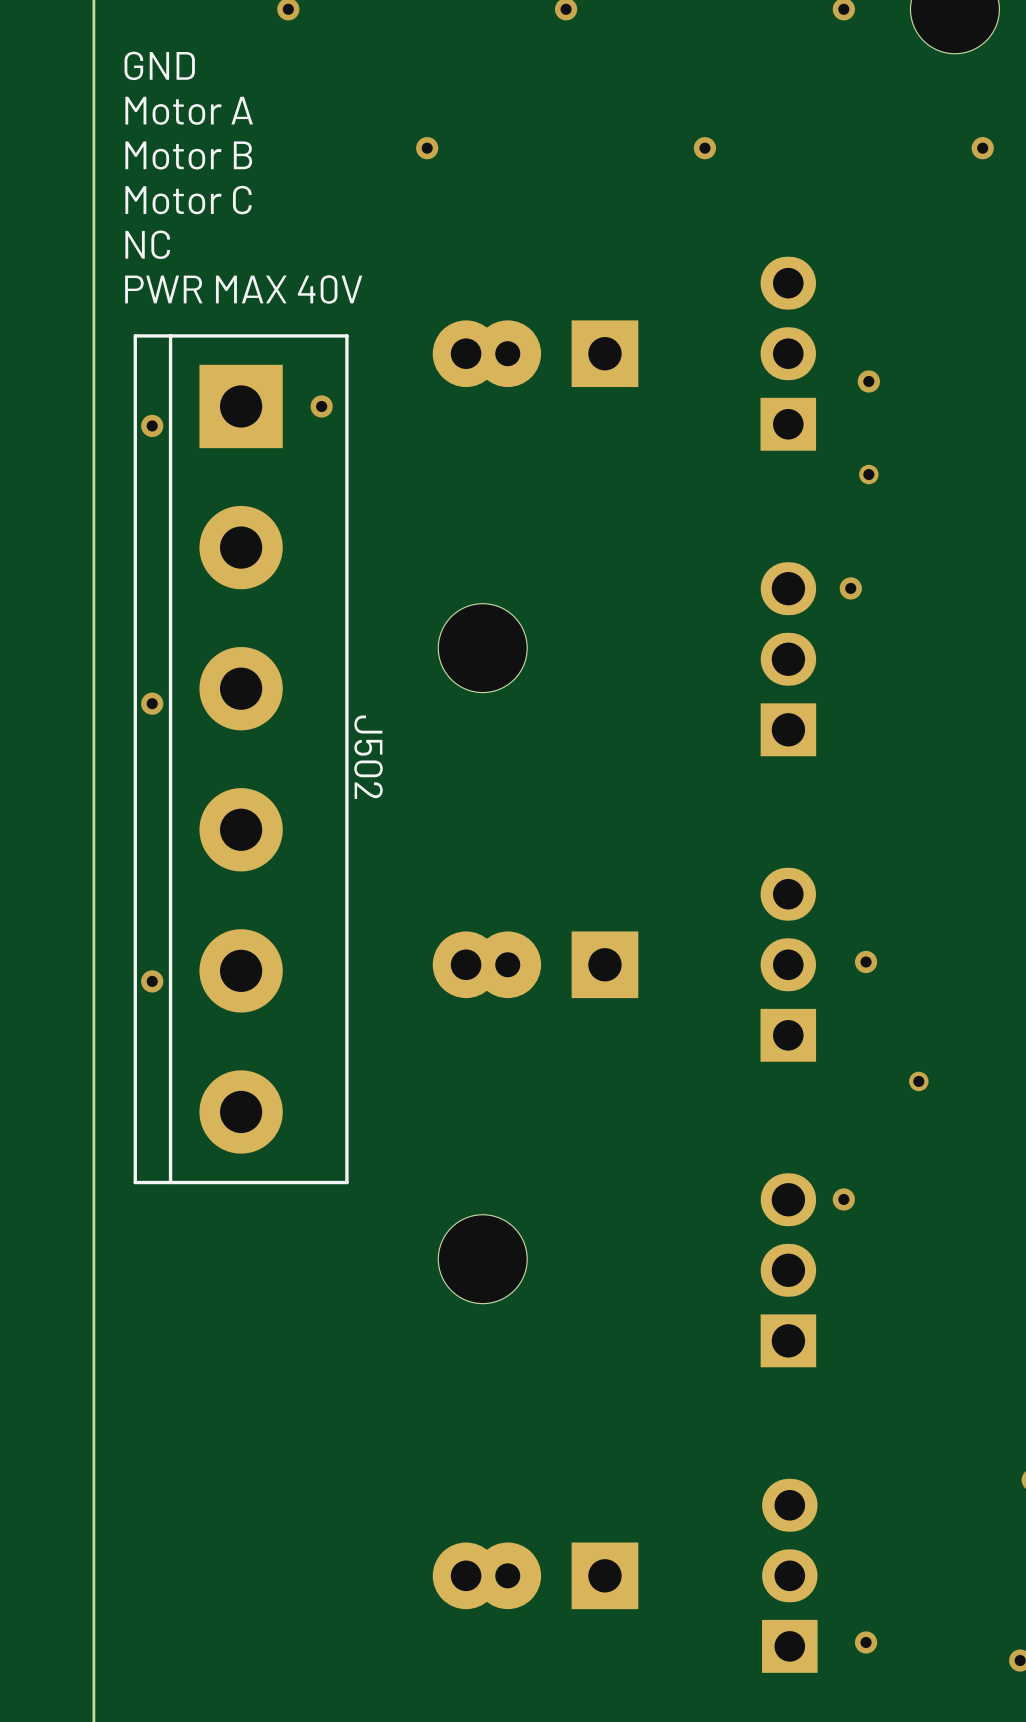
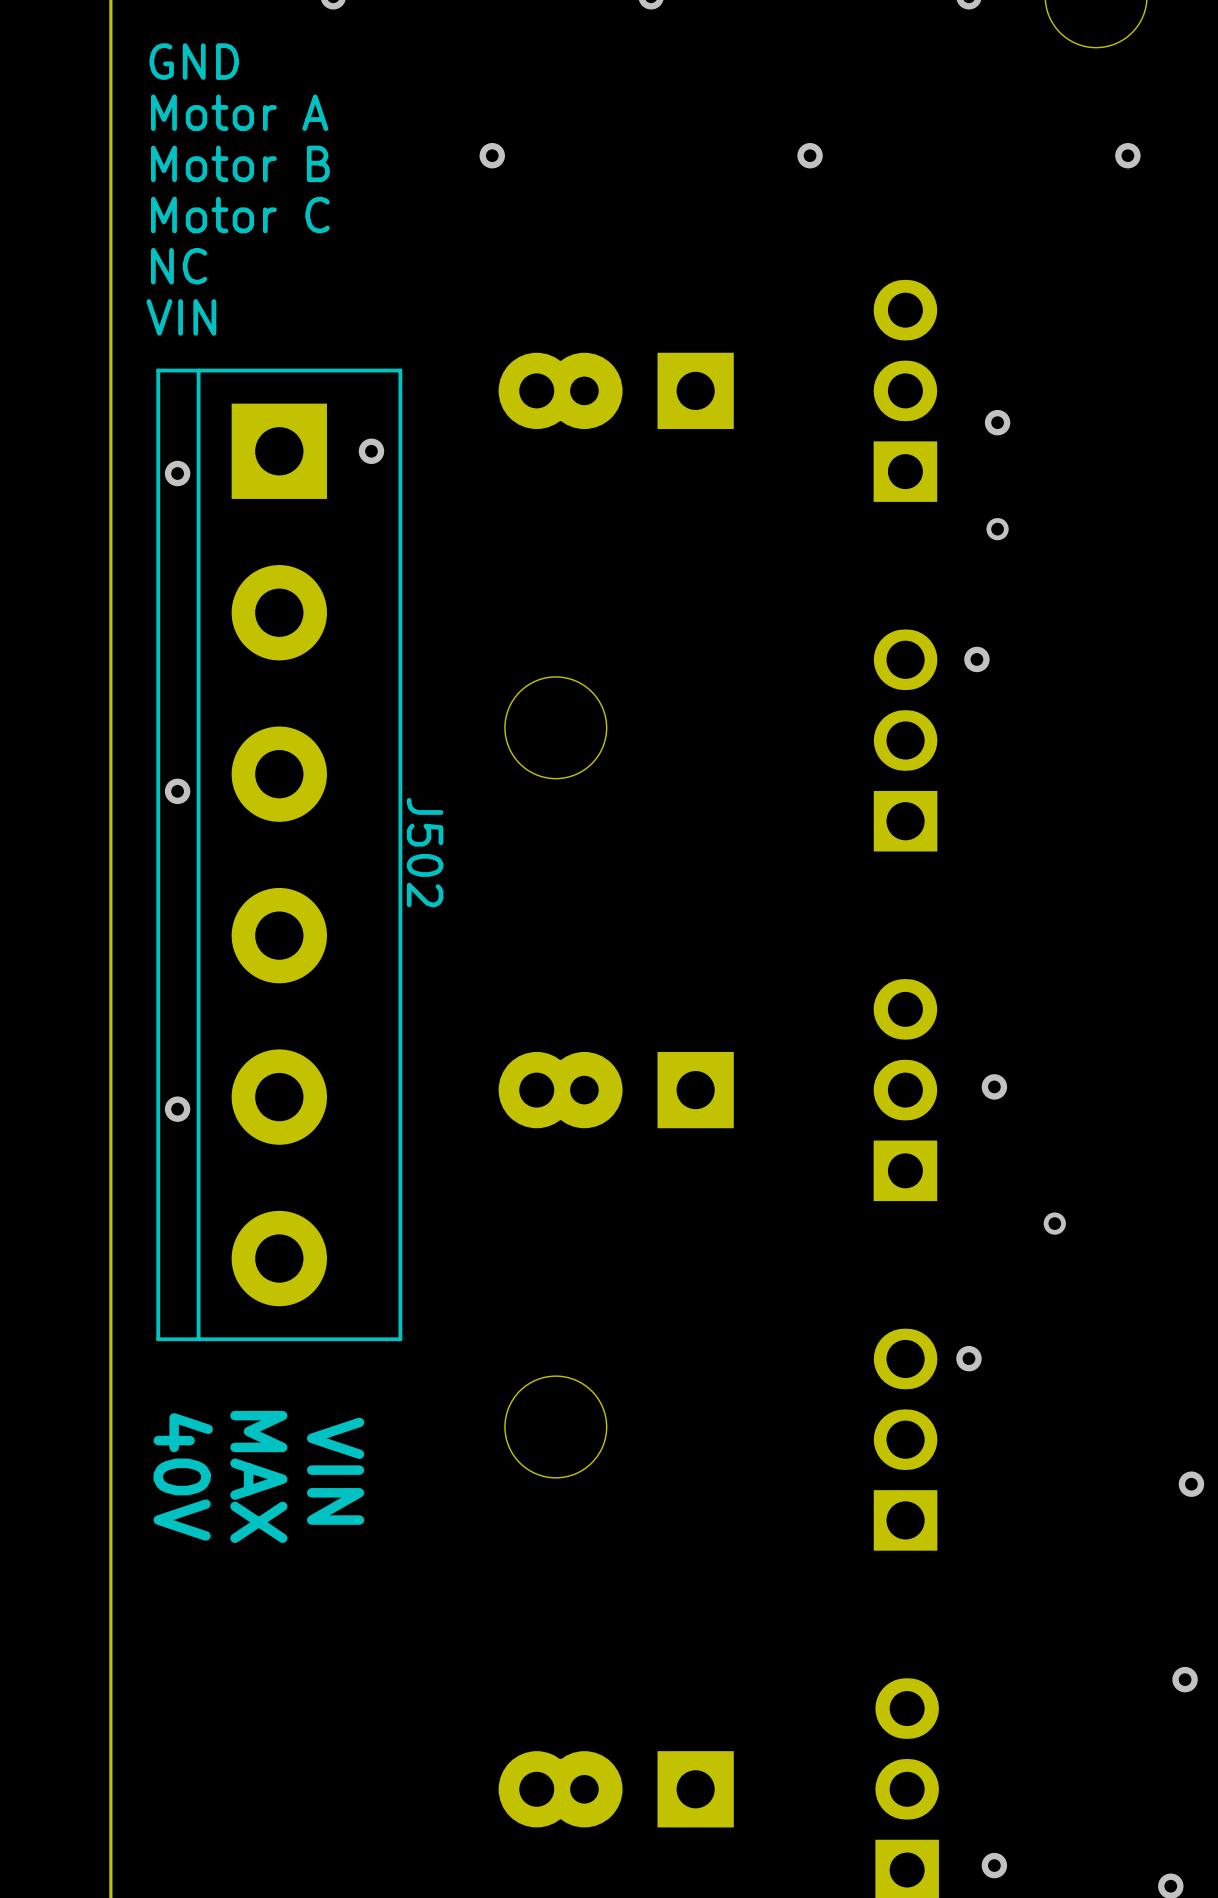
text: PWR MAX 40V (243, 289) -> VIN (181, 317)
text: none -> VIN (335, 1471)
text: none -> 40V (183, 1476)
text: none -> MAX (258, 1476)

